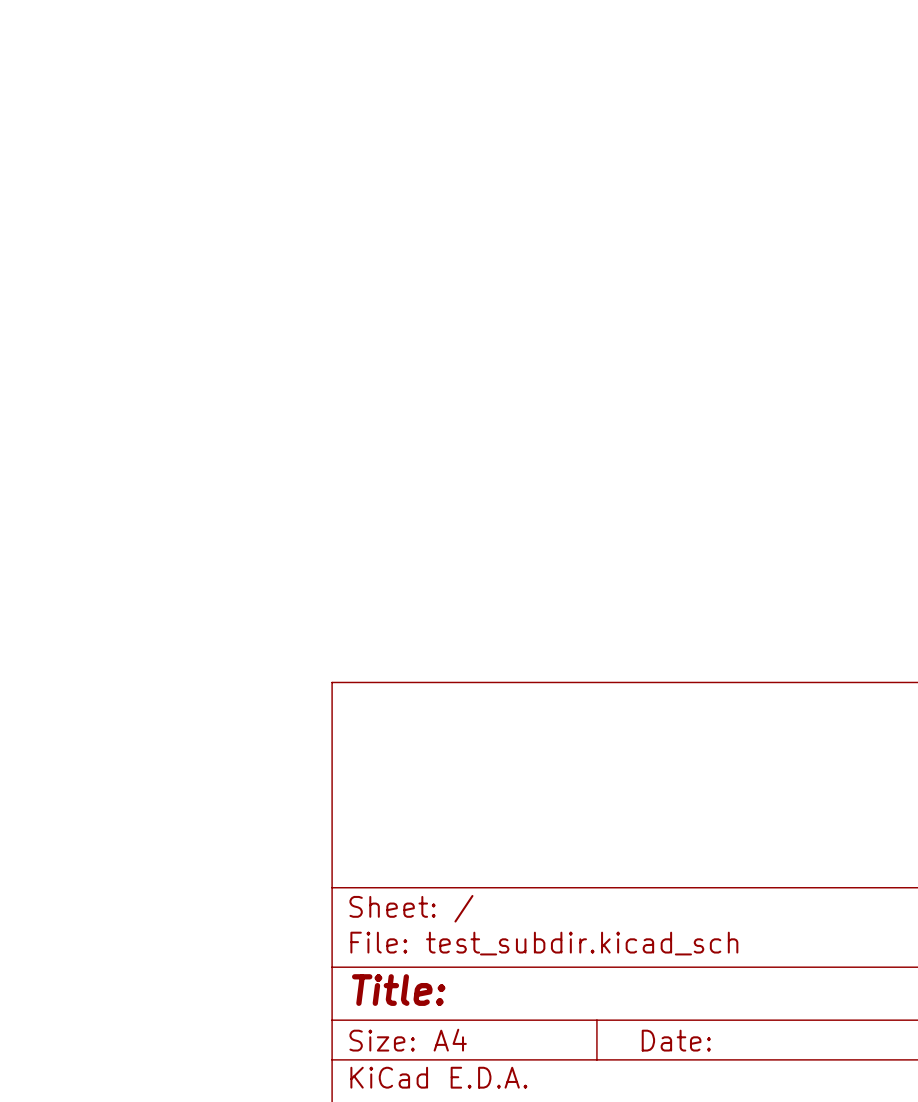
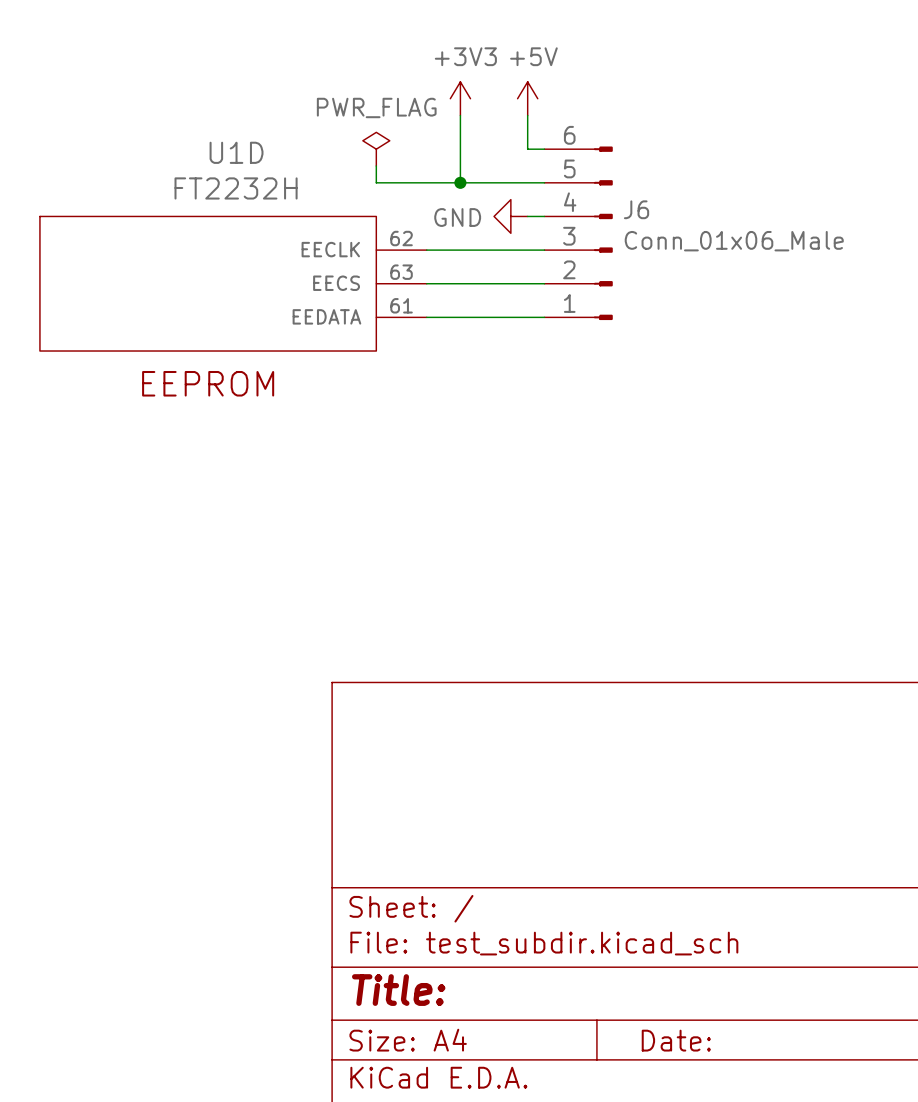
power symbol: none -> +3V3 (460, 98)
power symbol: none -> +5V (527, 98)
wire: none -> (460, 115) (460, 182)
wire: none -> (527, 115) (527, 149) (544, 149)
power symbol: none -> PWR_FLAG (376, 149)
wire: none -> (376, 166) (376, 182) (544, 182)
junction: none -> (460, 182)
power symbol: none -> GND (510, 216)
wire: none -> (527, 216) (544, 216)
J6: none -> Conn_01x06_Male (578, 233)
wire: none -> (426, 250) (544, 250)
U1D: none -> FT2232H (233, 283)
wire: none -> (426, 283) (544, 283)
wire: none -> (426, 317) (544, 317)

